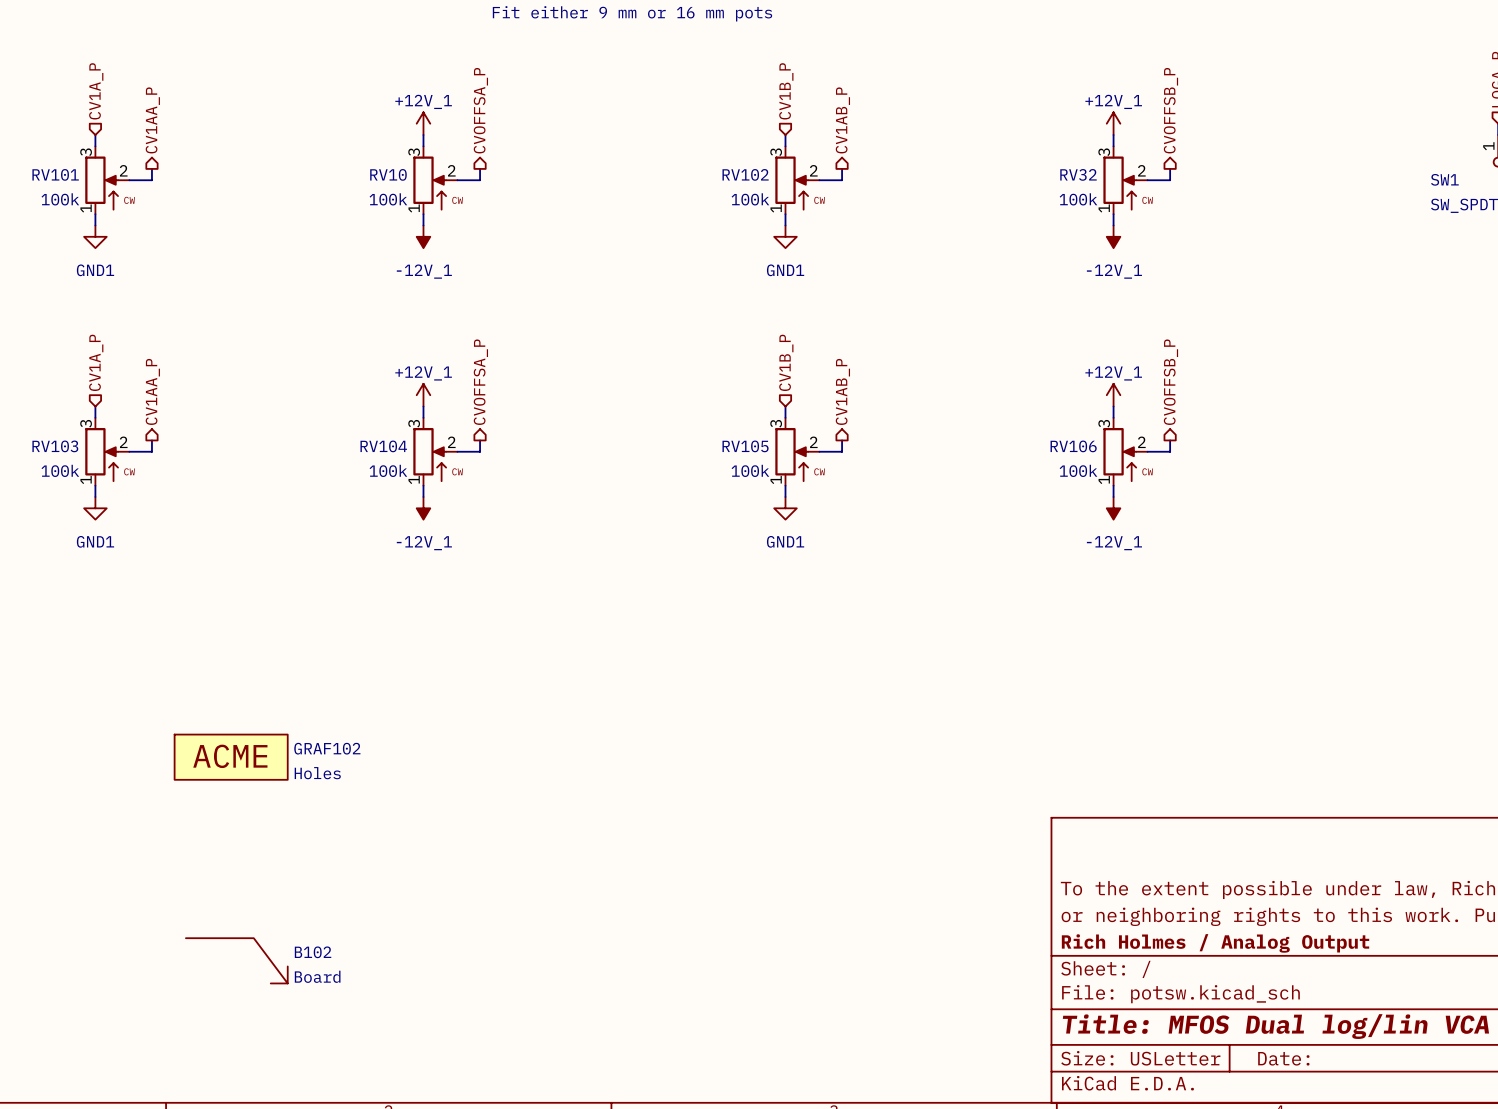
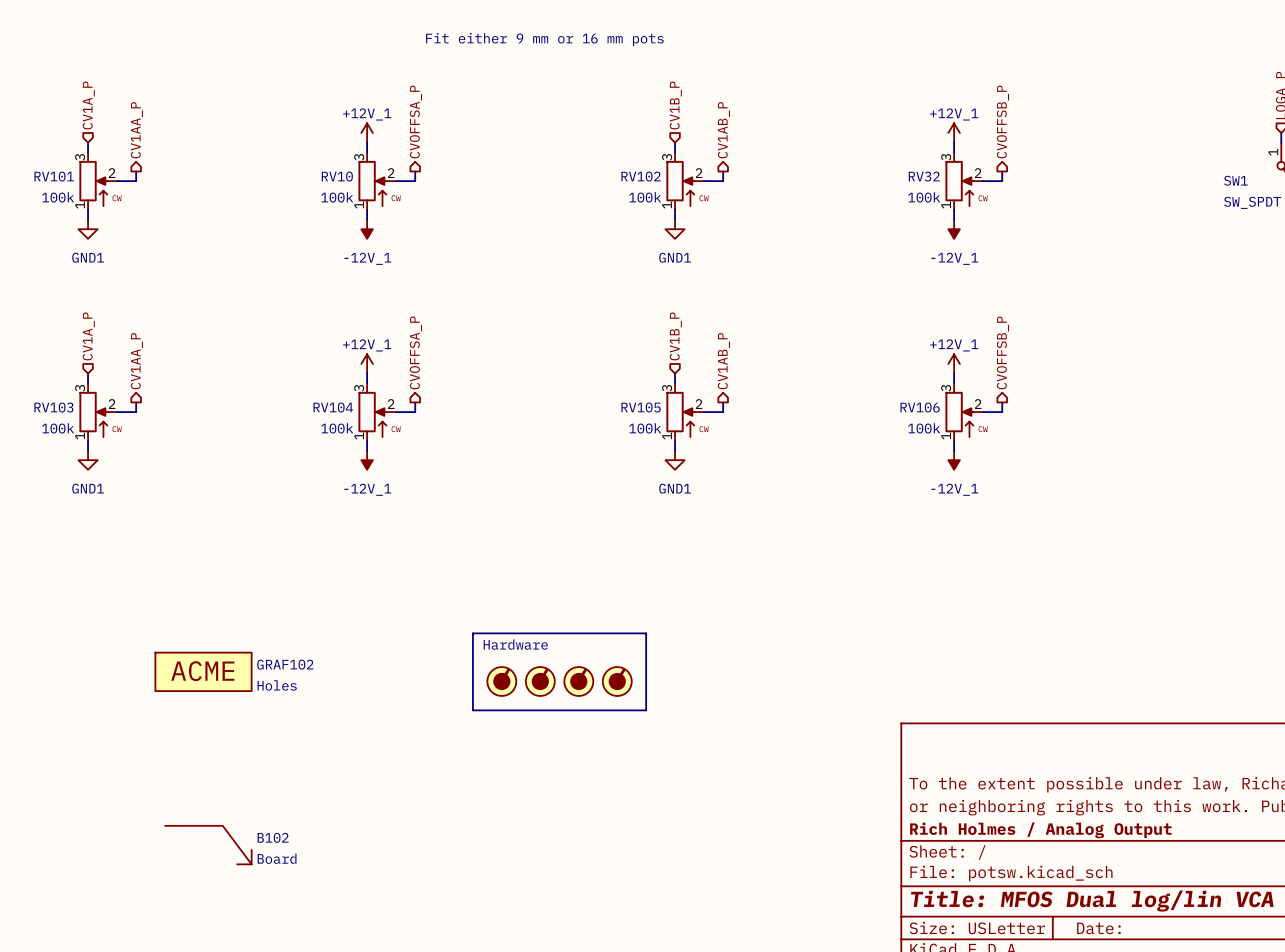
line: none -> (472, 633) (646, 633) (646, 710) (472, 710) (472, 633)
text: none -> Hardware (515, 644)
part: none -> (501, 681)
part: none -> (540, 681)
part: none -> (578, 681)
part: none -> (617, 681)

